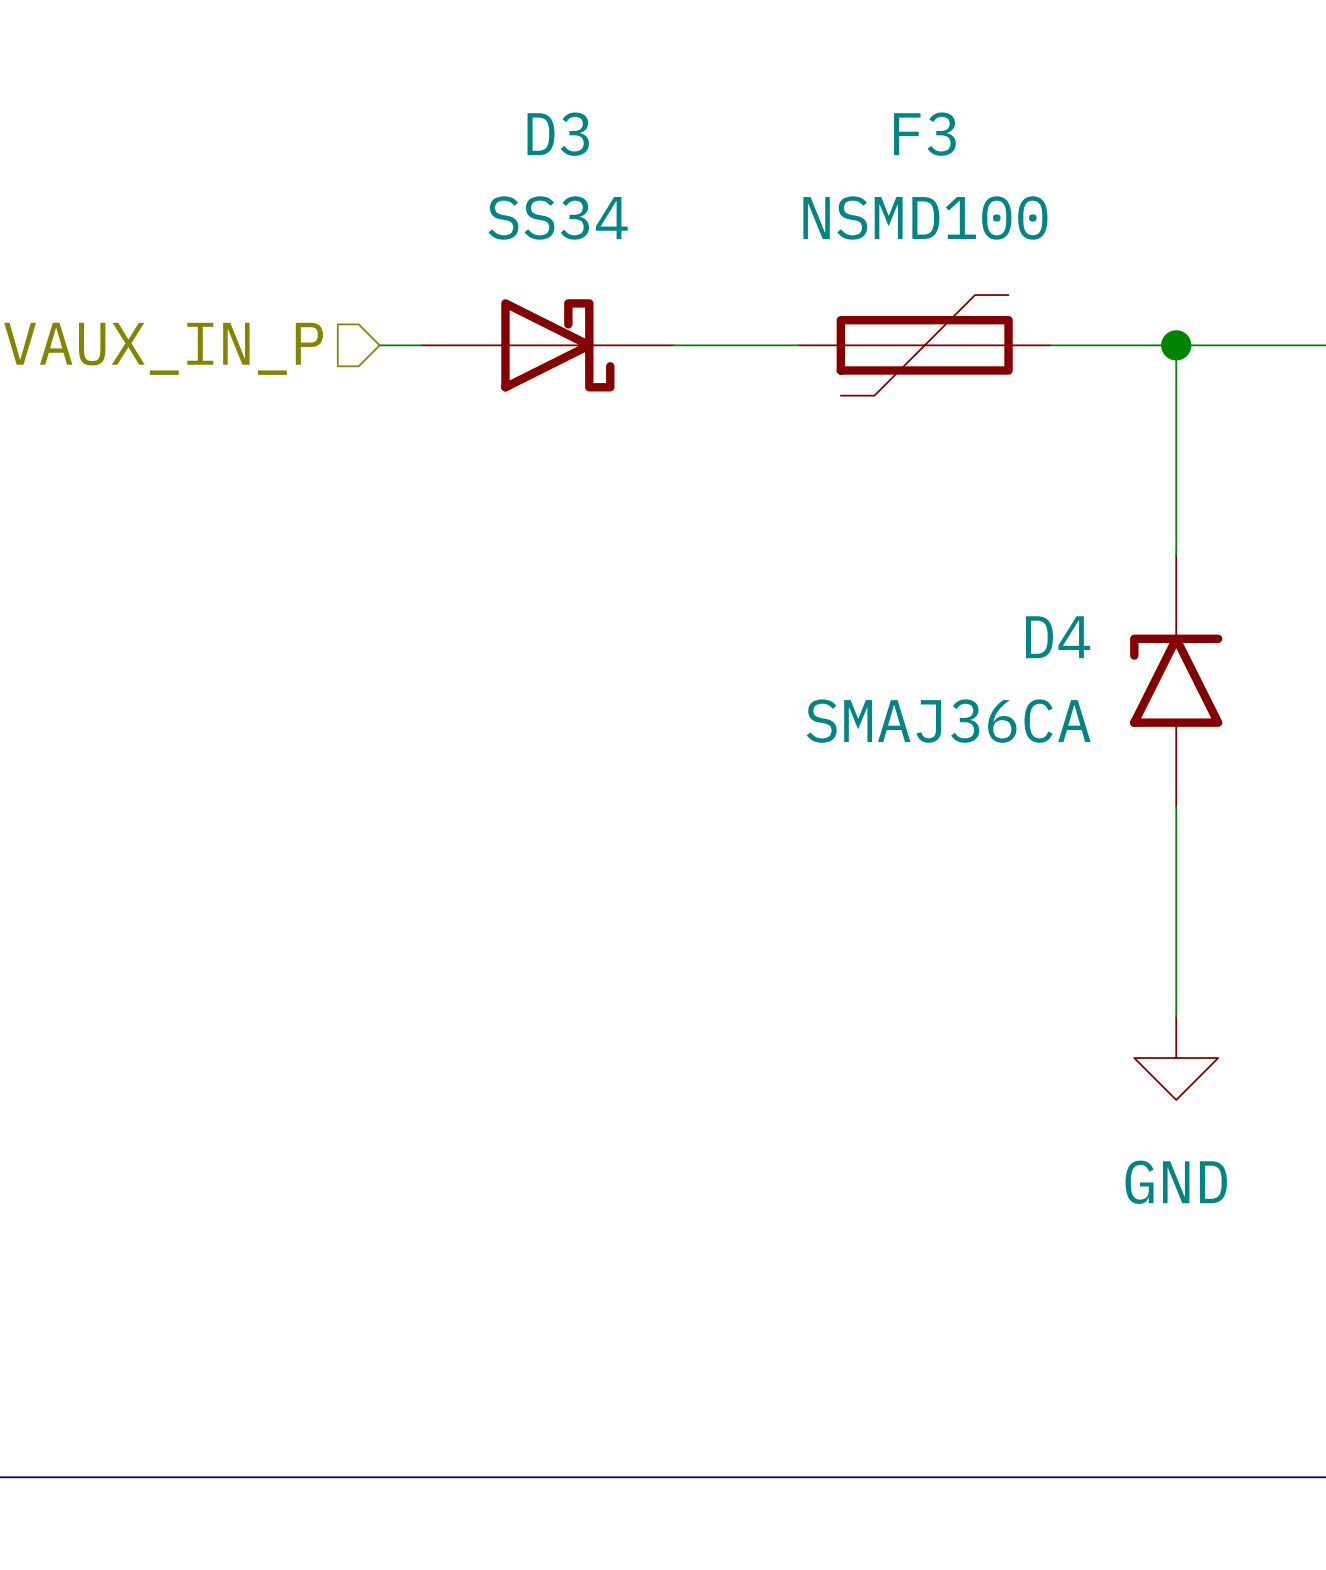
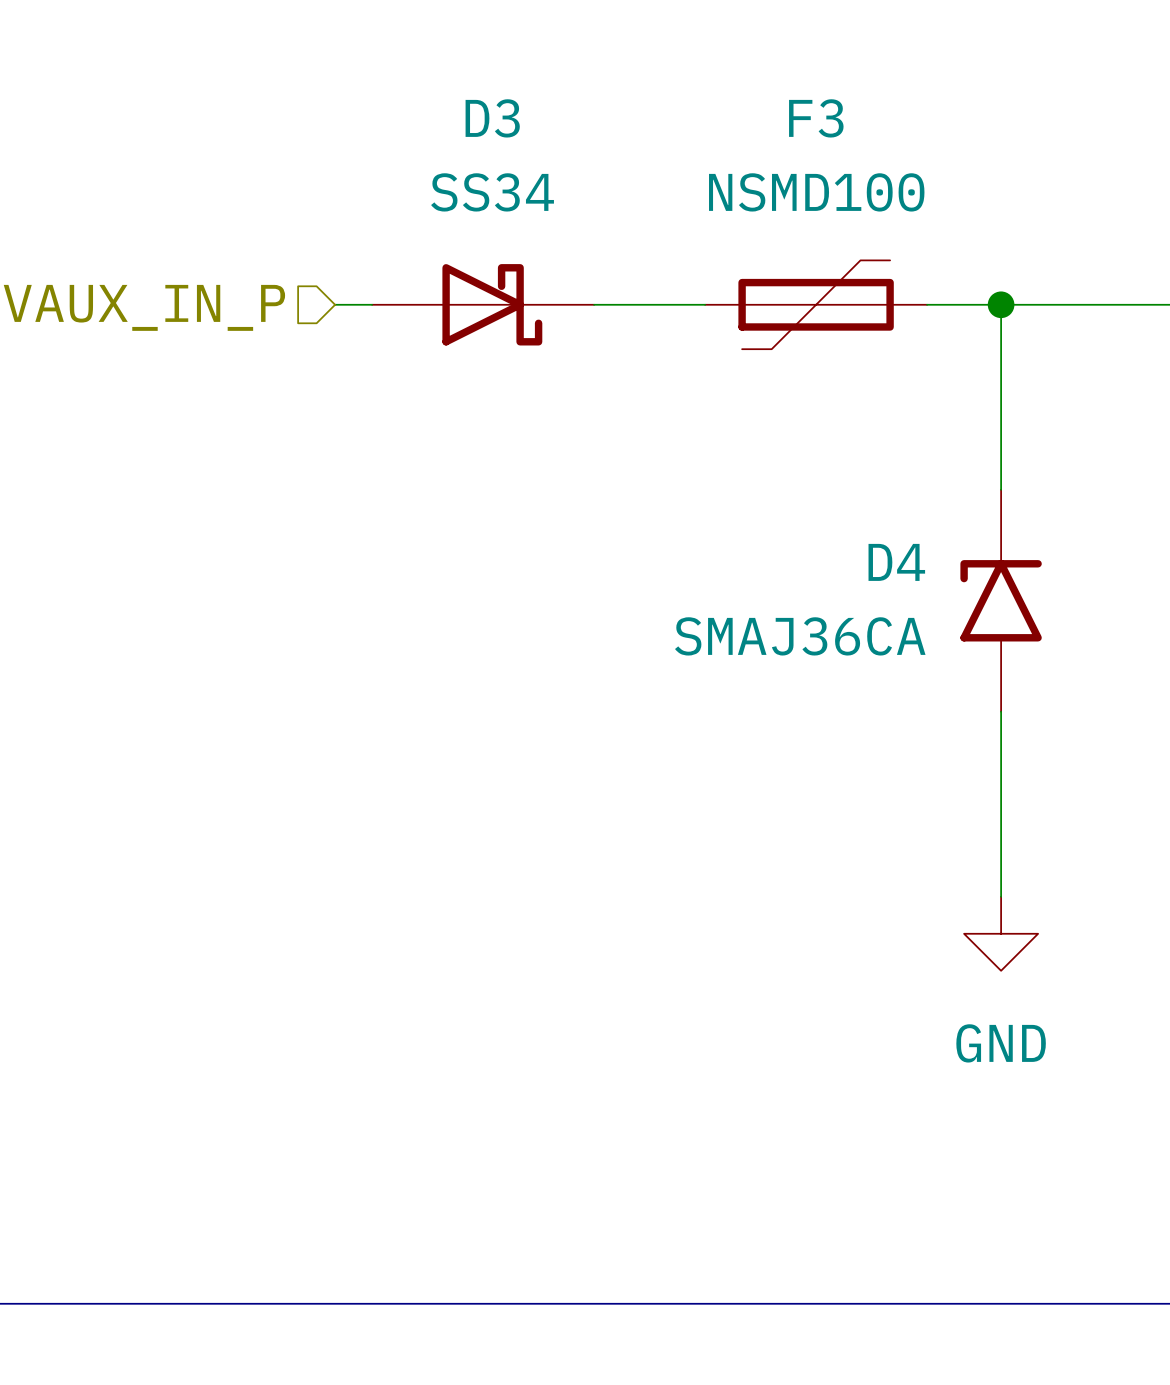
wire: (1176, 345) (1176, 554) -> (1001, 304) (1001, 489)
junction position: (1176, 345) -> (1001, 304)
D4 position: (1176, 680) -> (1001, 600)
wire: (1176, 806) (1176, 1016) -> (1001, 711) (1001, 896)
power symbol position: GND (1176, 1058) -> GND (1001, 933)

